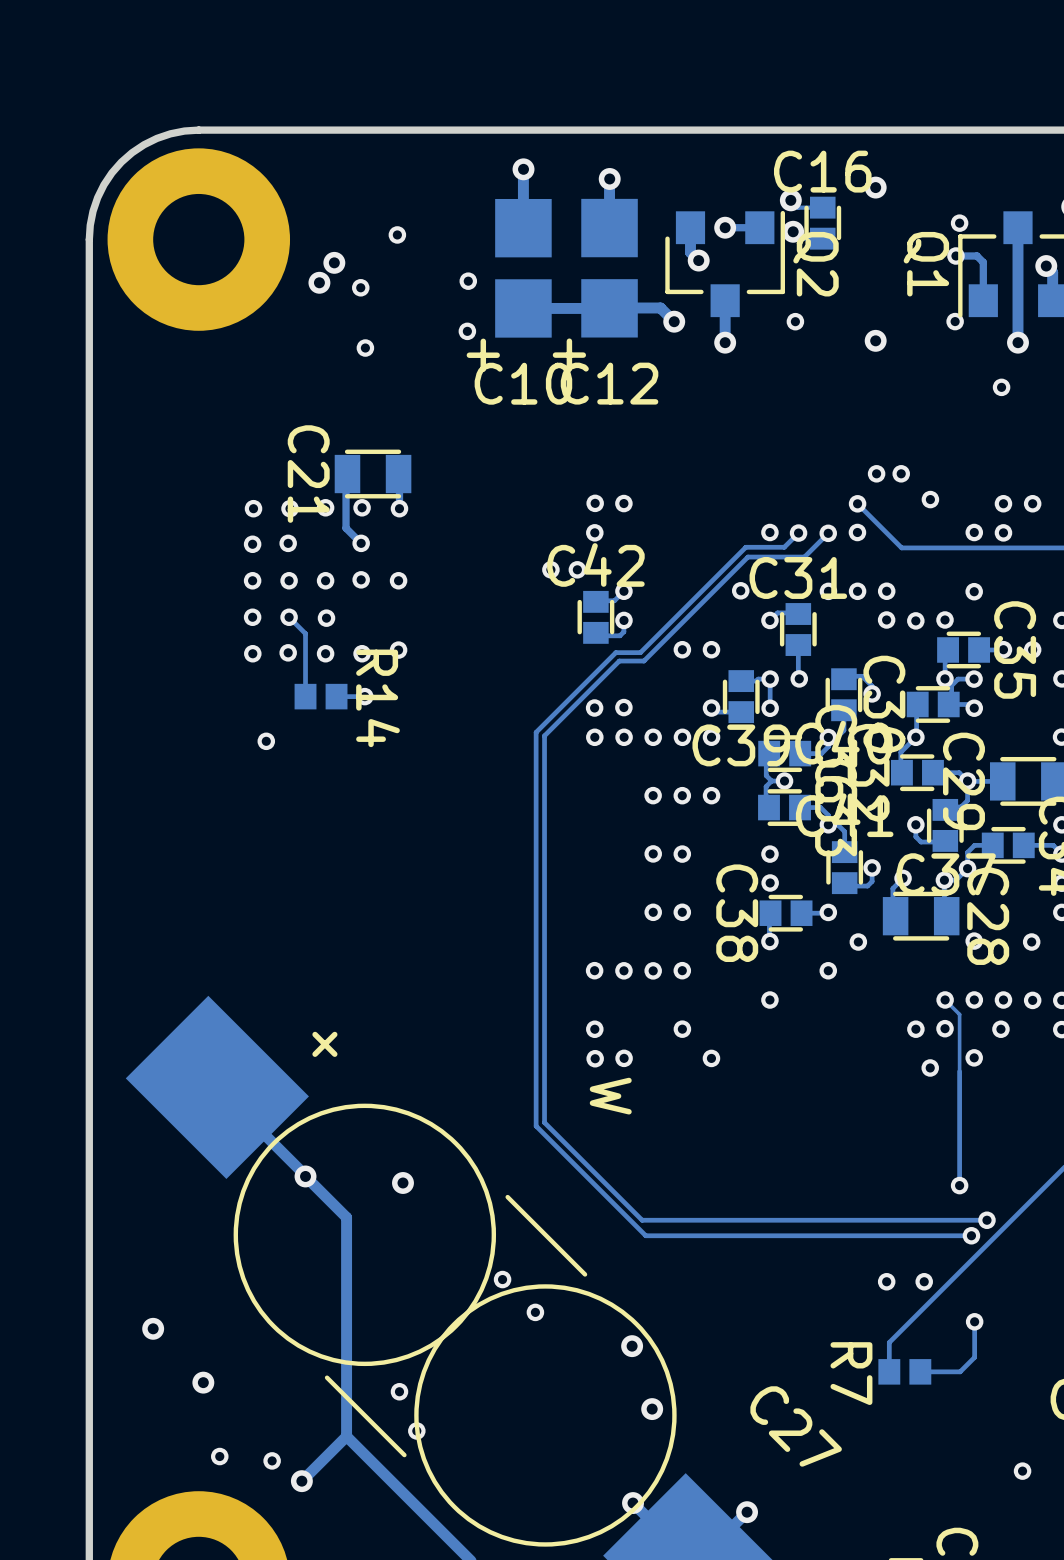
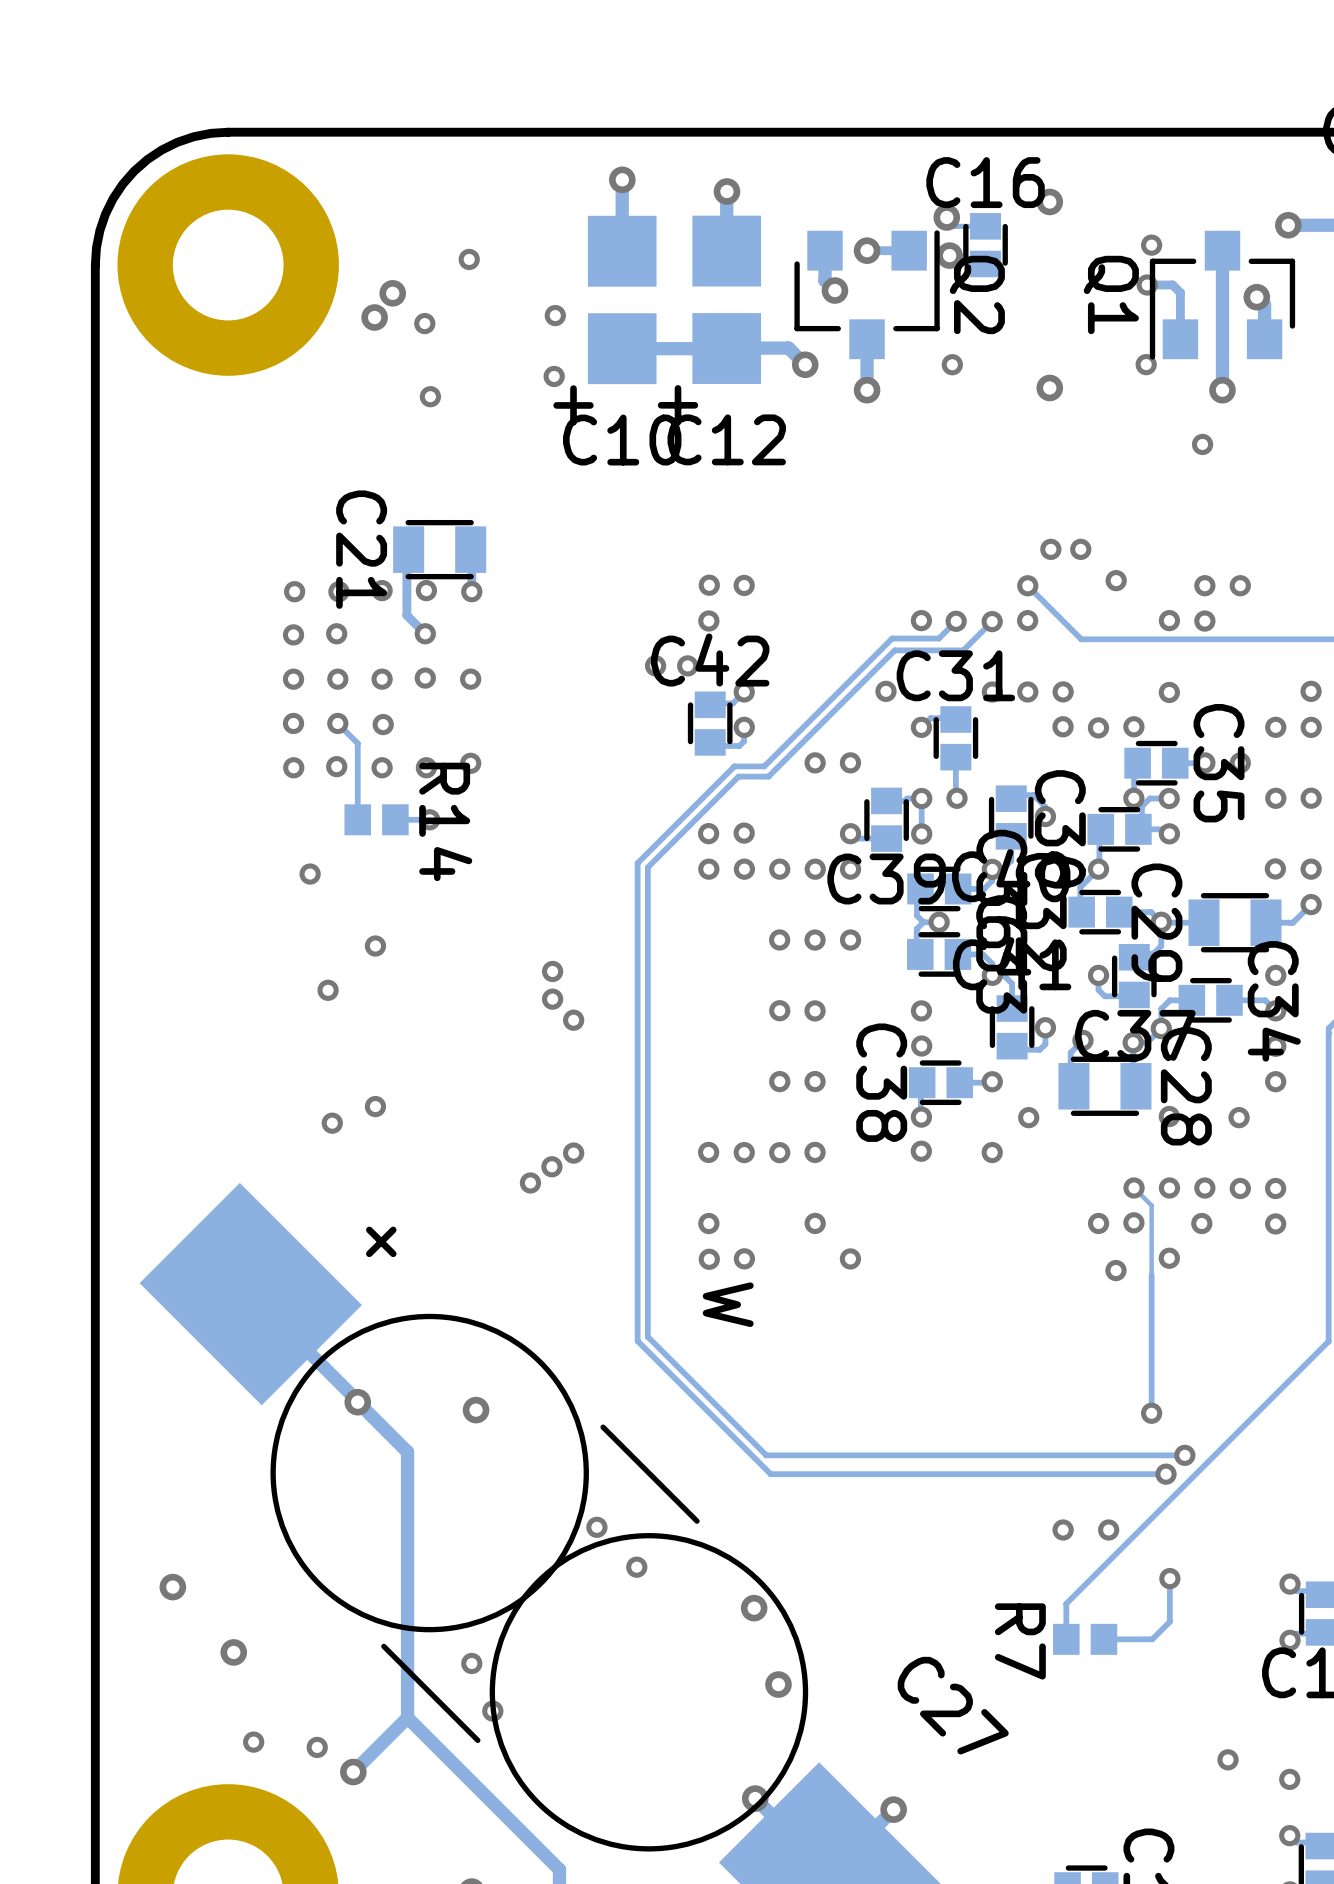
via: none -> (375, 946)
via: none -> (552, 971)
via: none -> (328, 990)
via: none -> (552, 999)
via: none -> (573, 1020)
via: none -> (375, 1106)
via: none -> (332, 1123)
via: none -> (573, 1153)
via: none -> (551, 1166)
via: none -> (530, 1182)
via position: (769, 1000) -> (921, 1151)

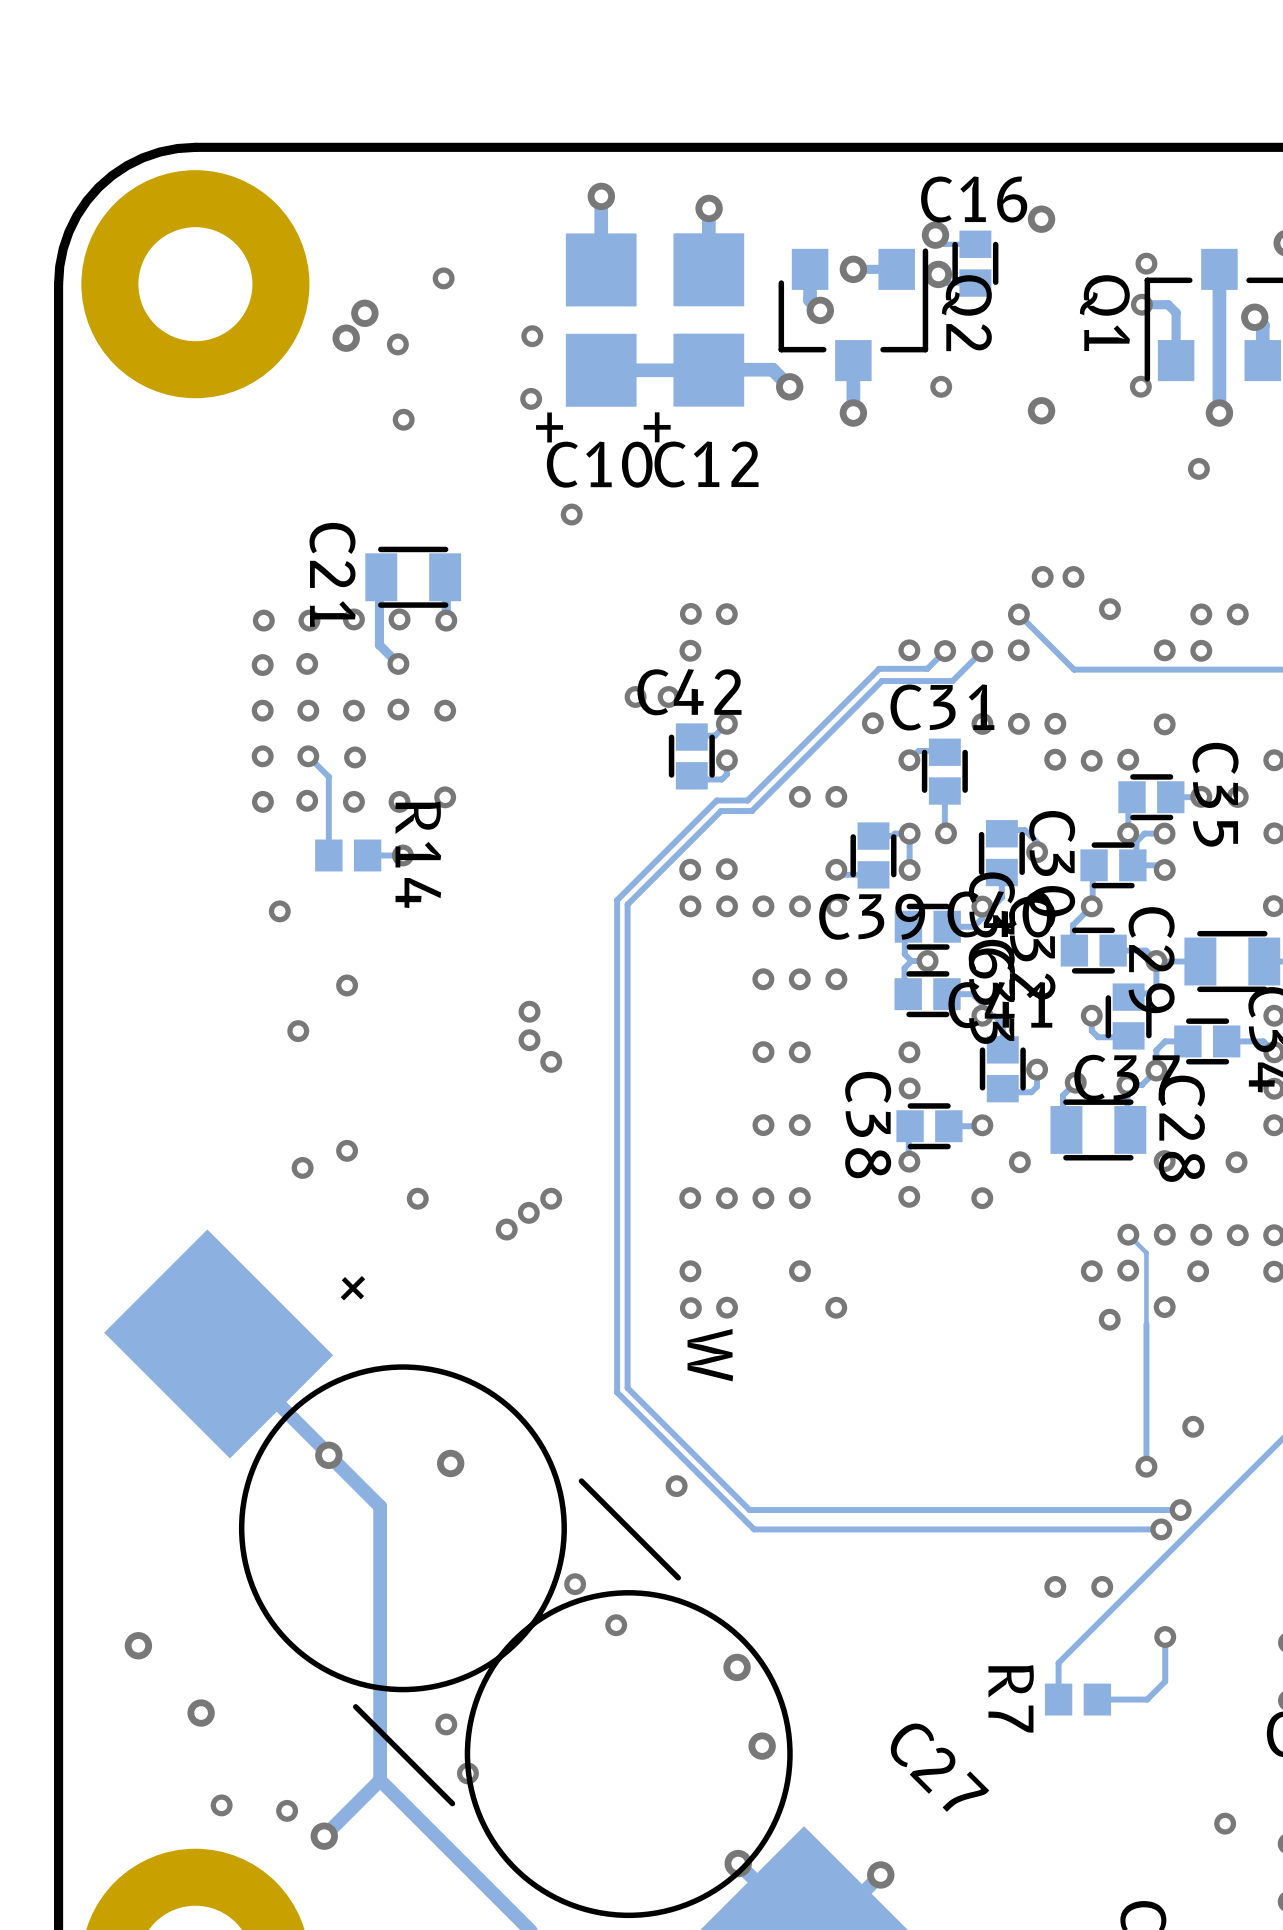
via: none -> (571, 514)
via: none -> (417, 1198)
via: none -> (1193, 1426)
via: none -> (676, 1486)

